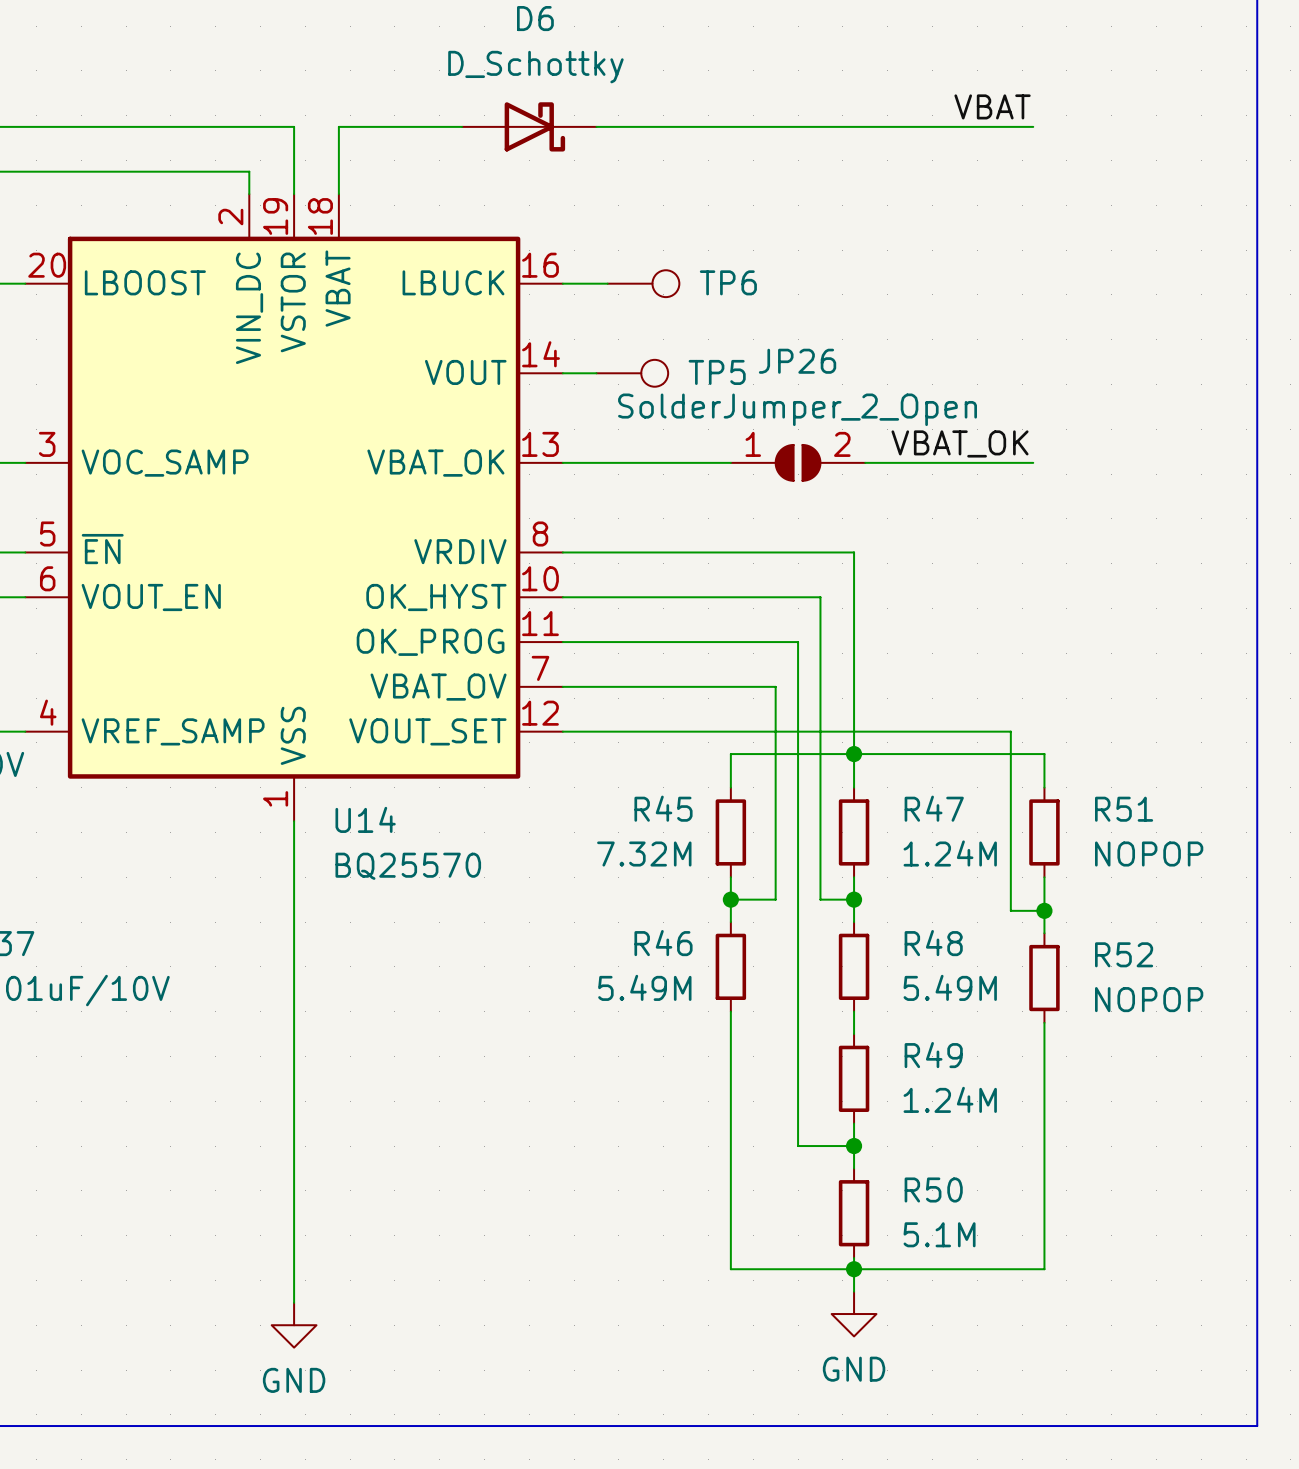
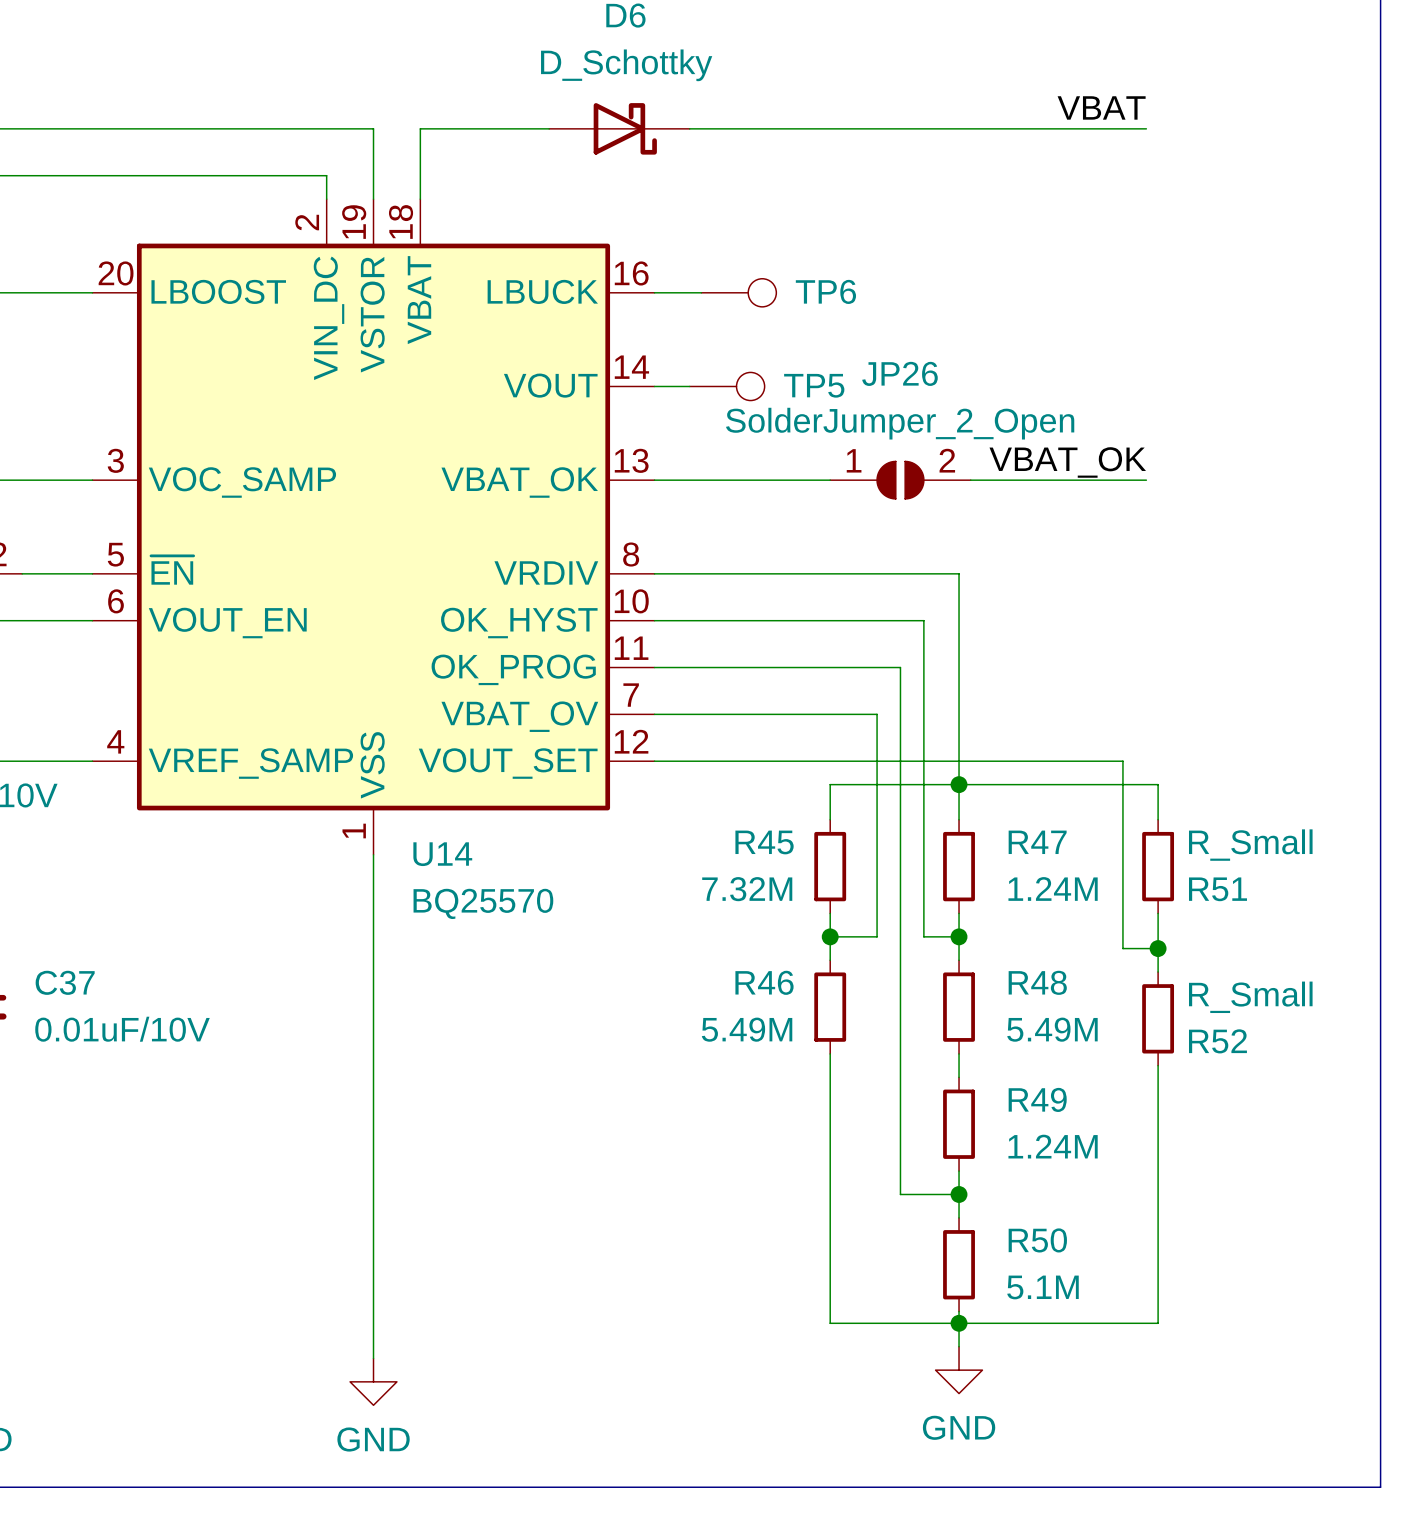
R51 name position: R51 (1124, 809) -> R51 (1217, 889)
R51 value: NOPOP (1149, 854) -> R_Small (1250, 845)
R52 name position: R52 (1124, 954) -> R52 (1217, 1041)
R52 value: NOPOP (1149, 999) -> R_Small (1250, 997)

